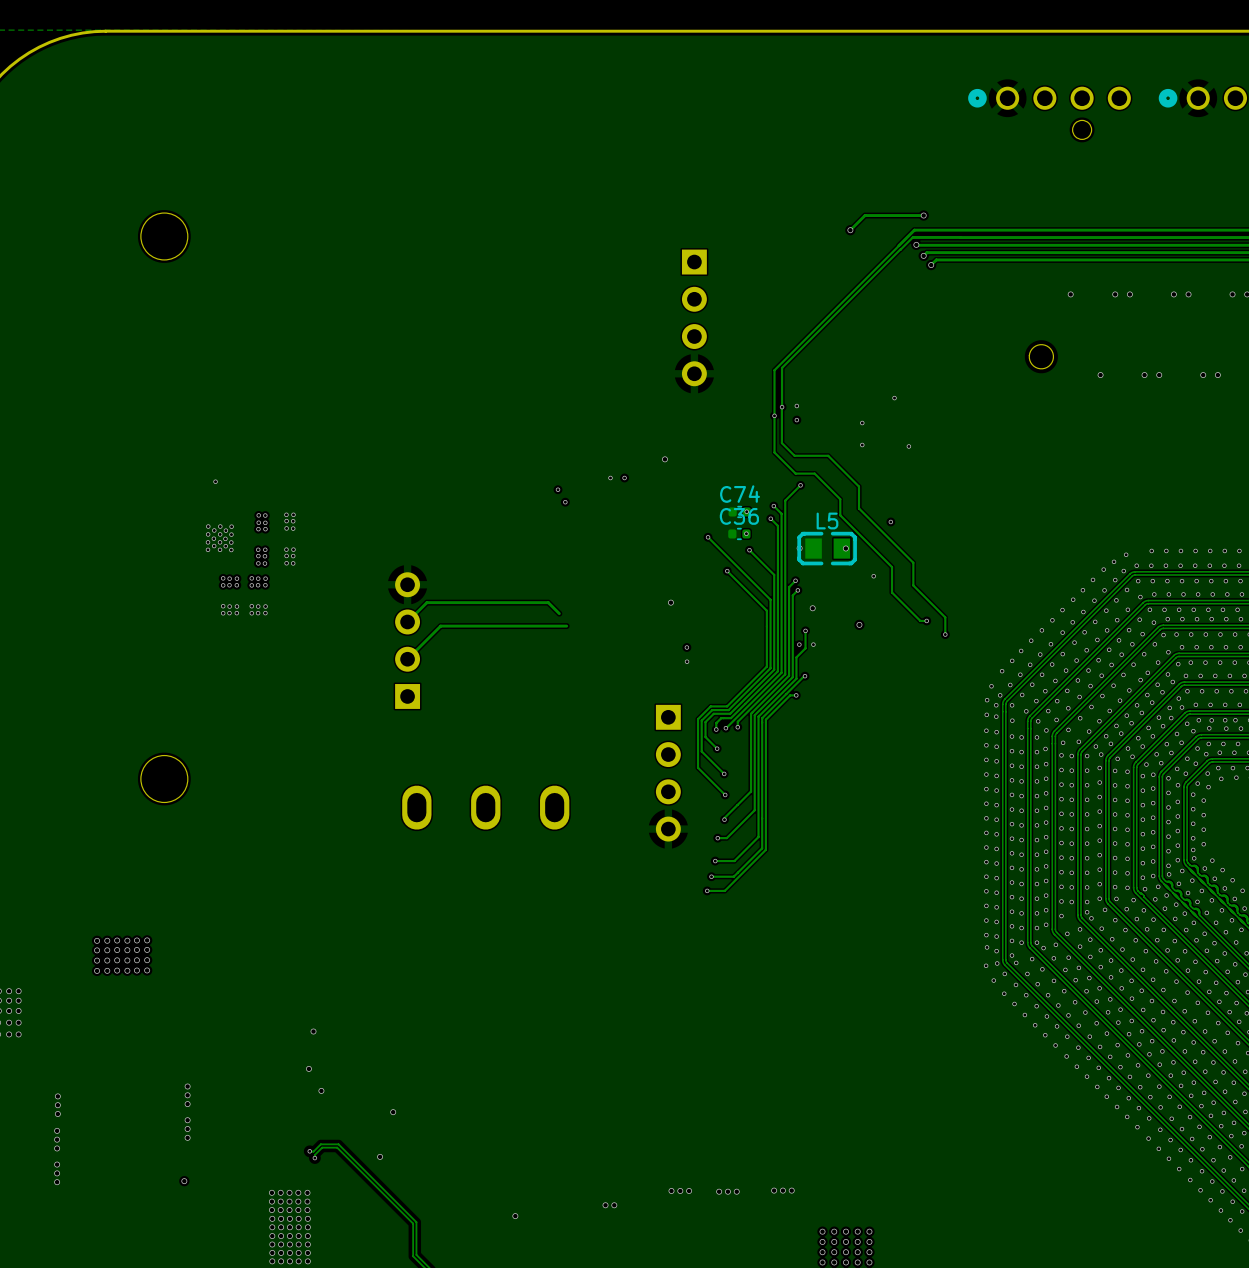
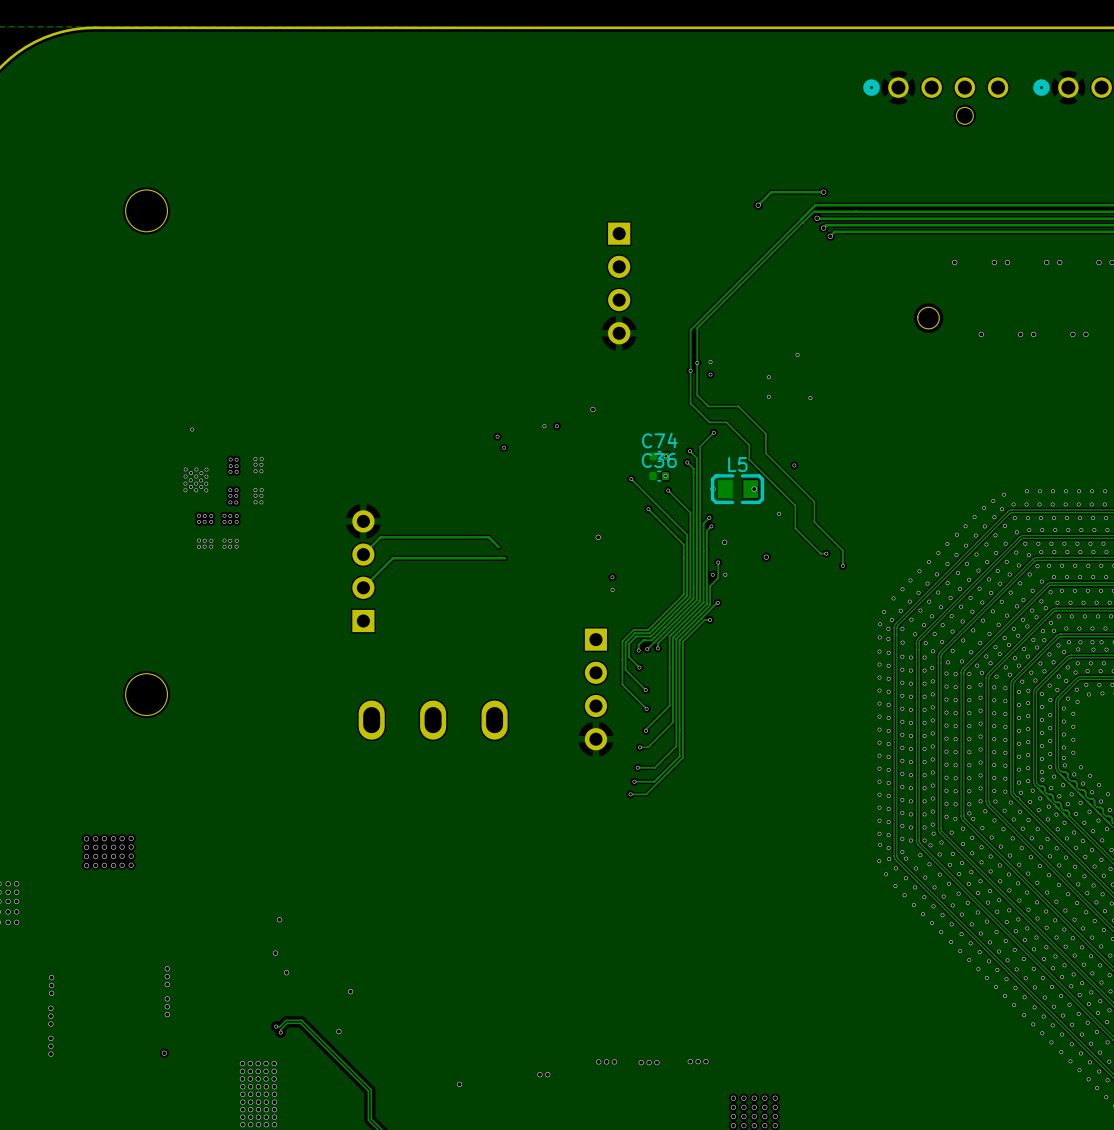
via: none -> (955, 818)
via: none -> (933, 833)

